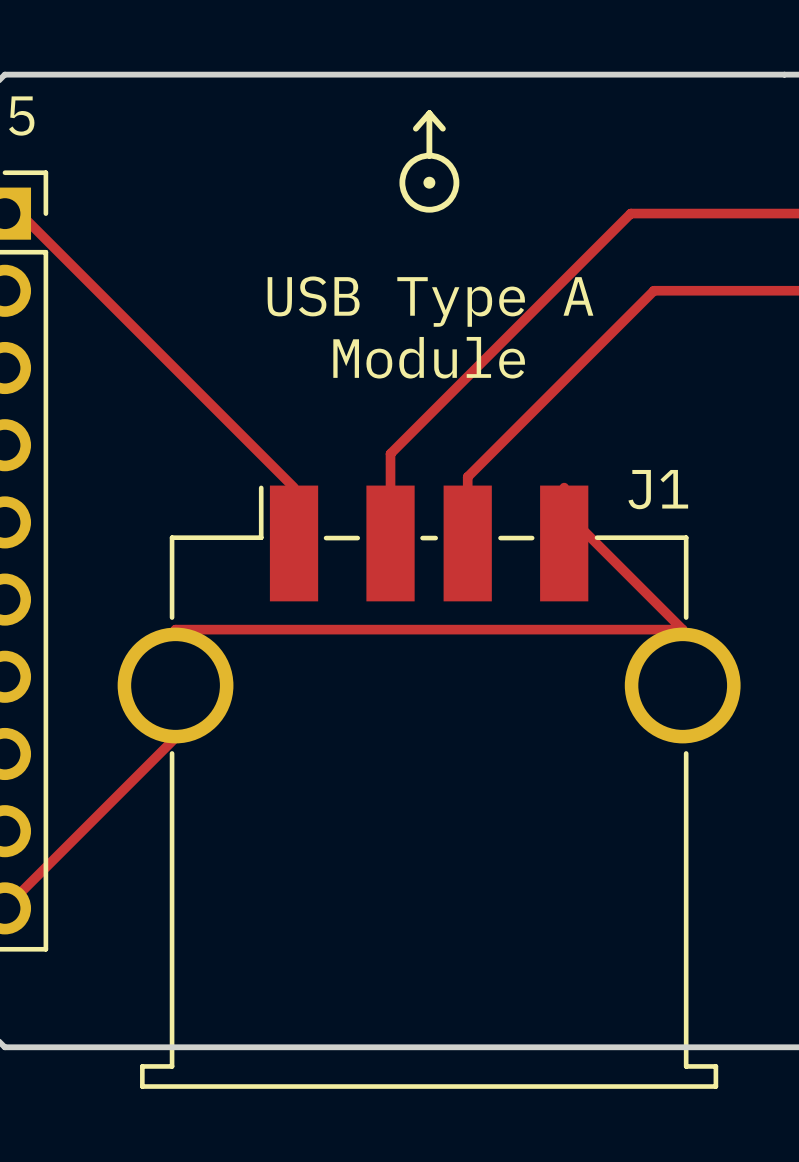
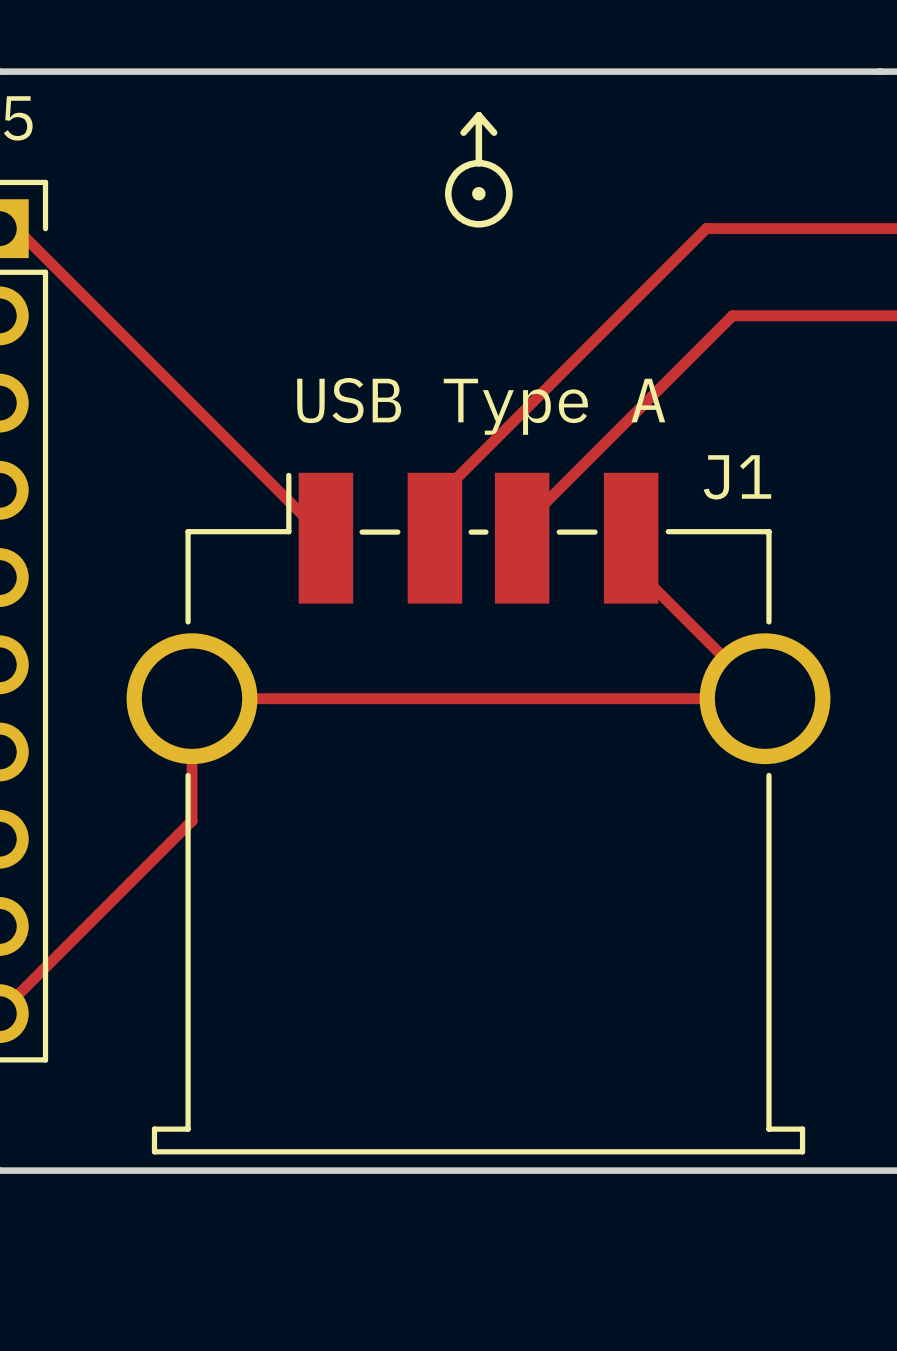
text position: USB Type A (430, 301) -> USB Type A (481, 406)
text: Module (429, 357) -> none
J1 position: (429, 787) -> (478, 813)

